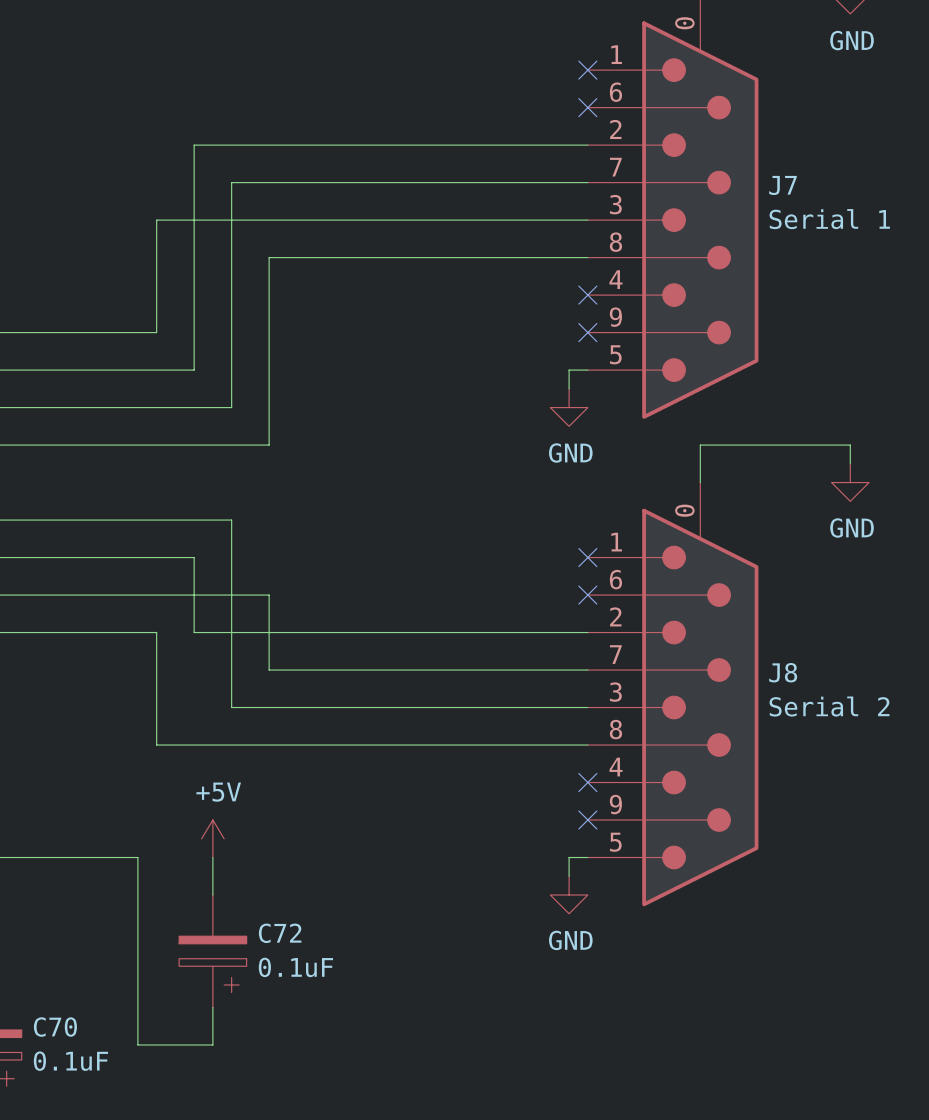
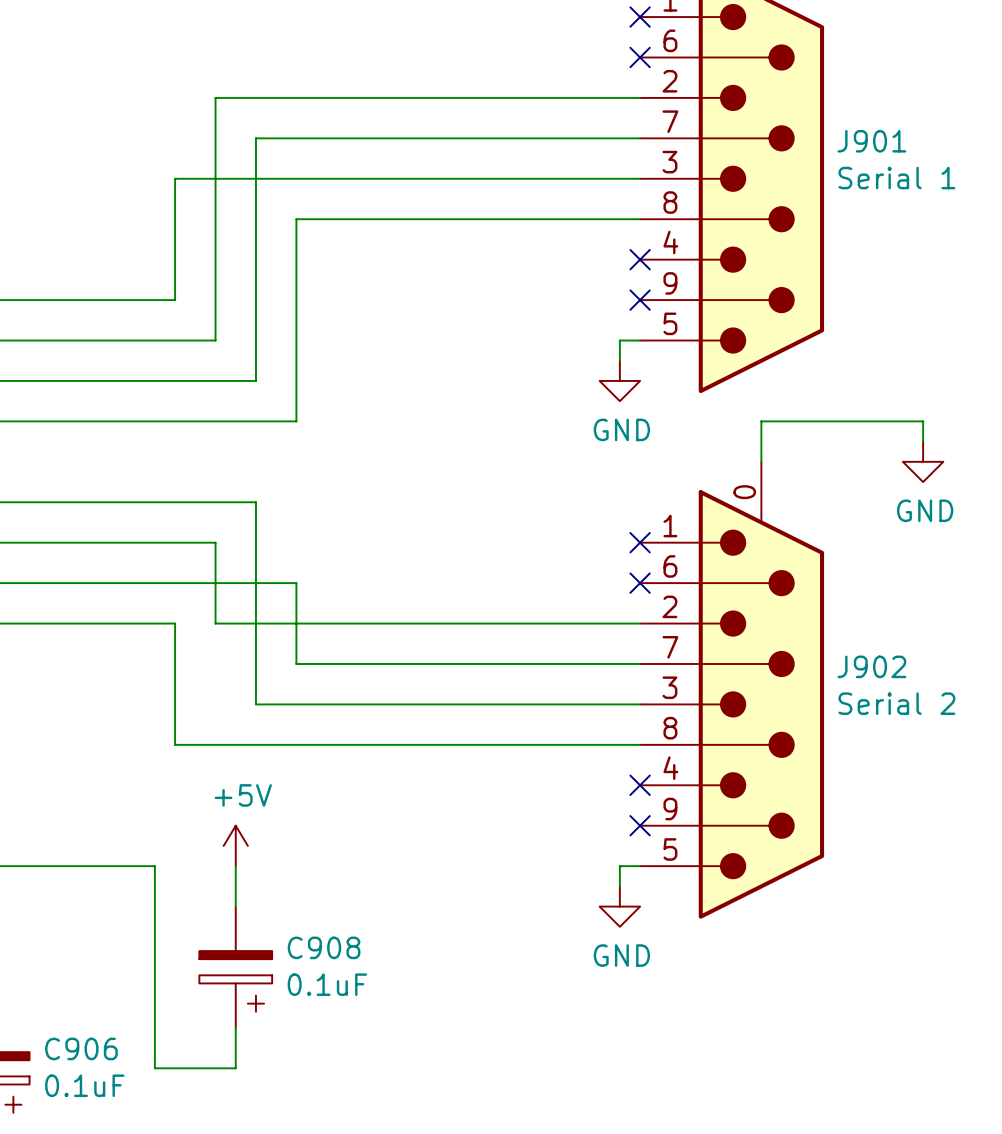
J7 name: J7 (783, 185) -> J901 (871, 141)
J8 name: J8 (783, 672) -> J902 (871, 666)
C72 name: C72 (280, 933) -> C908 (324, 947)
C70 name: C70 (55, 1027) -> C906 (81, 1048)

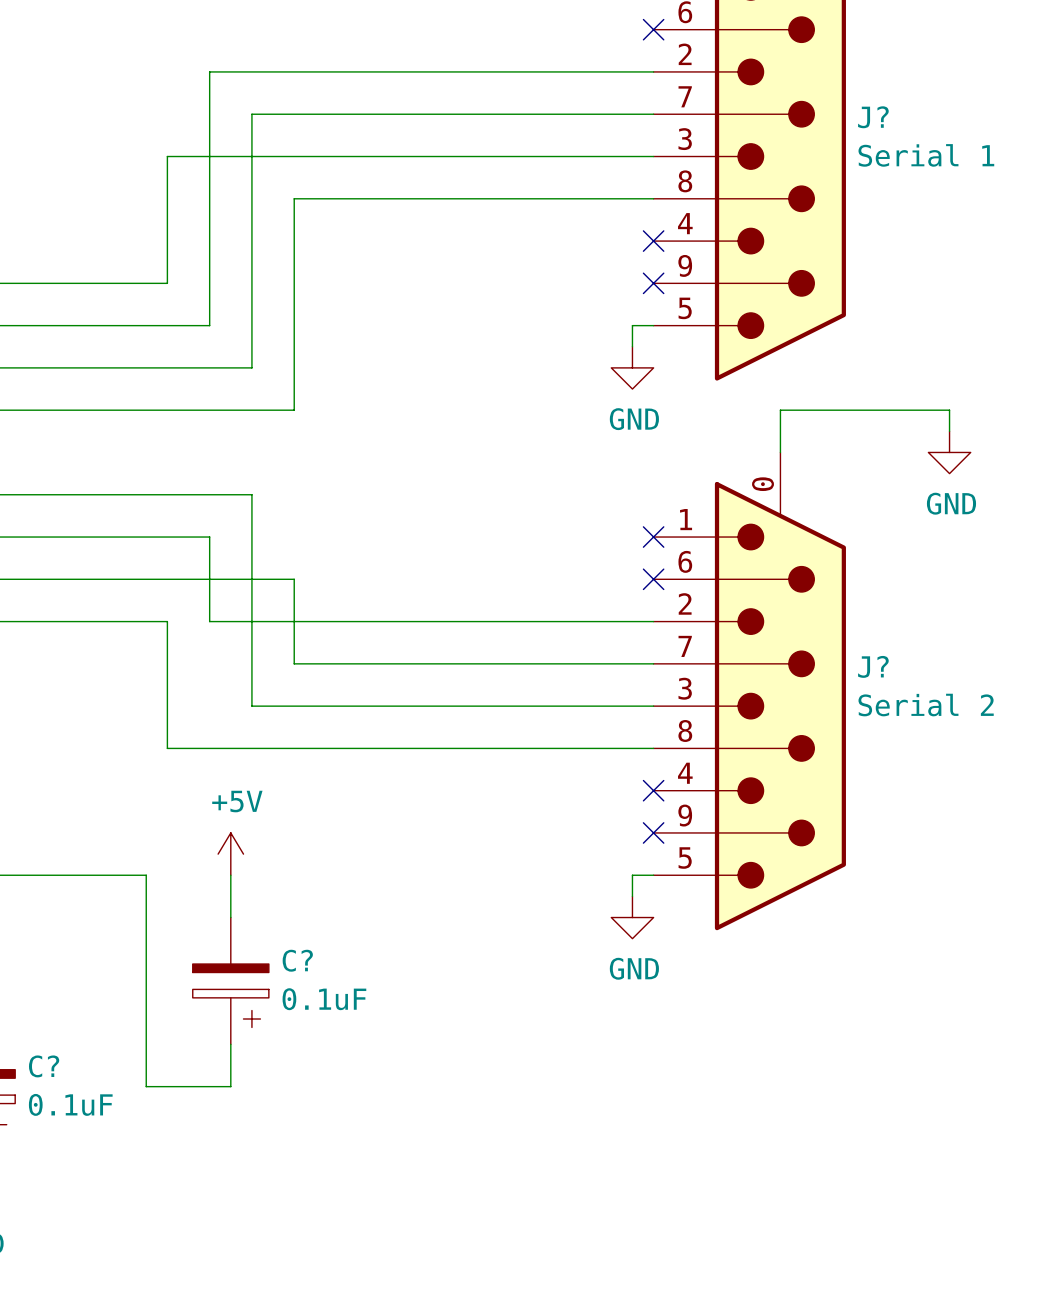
J901 name: J901 (871, 141) -> J? (873, 117)
J902 name: J902 (871, 666) -> J? (873, 666)
C908 name: C908 (324, 947) -> C? (297, 960)
C906 name: C906 (81, 1048) -> C? (44, 1066)

